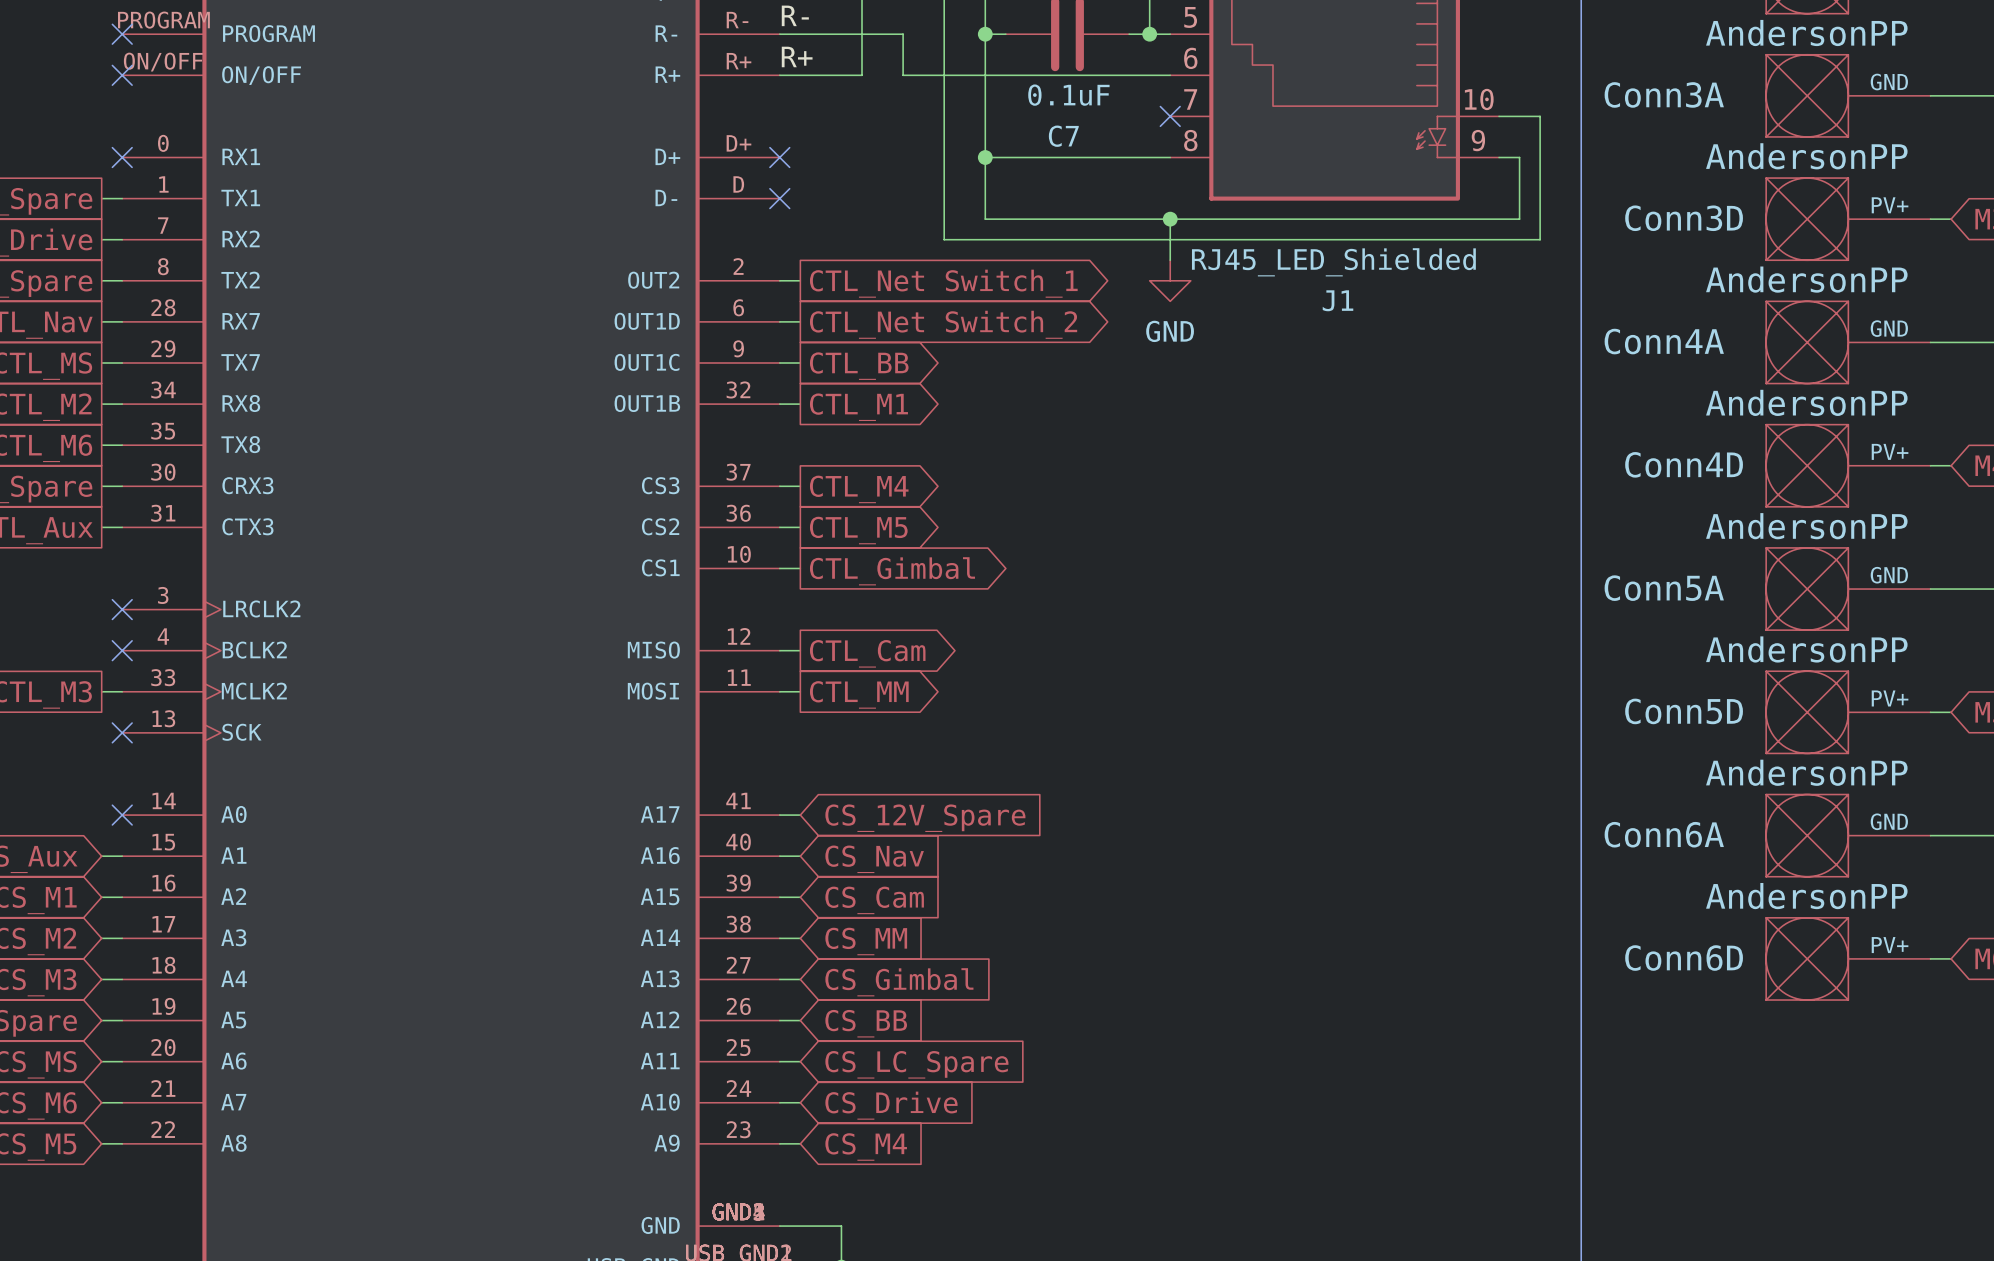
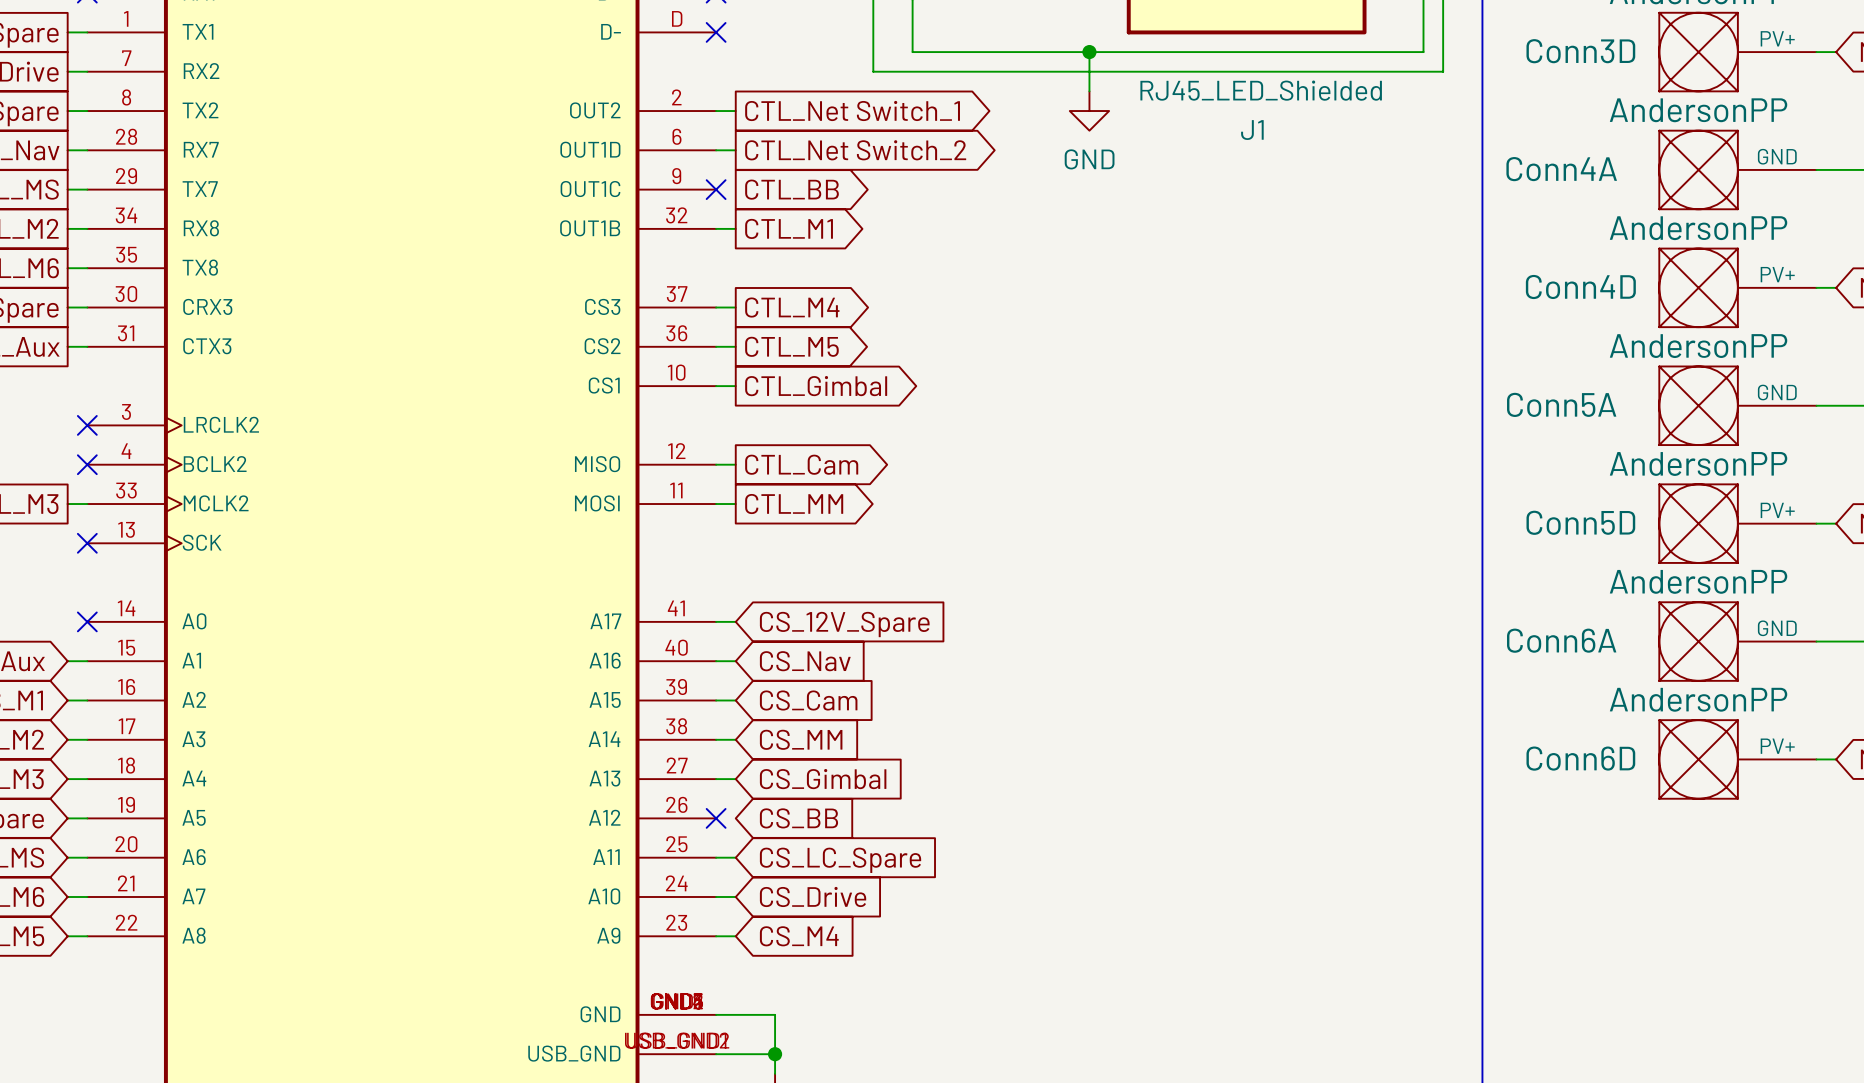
wire: (779, 362) (800, 362) -> none
no-connect mark: none -> (716, 189)
wire: (779, 1020) (800, 1020) -> none
no-connect mark: none -> (716, 818)

